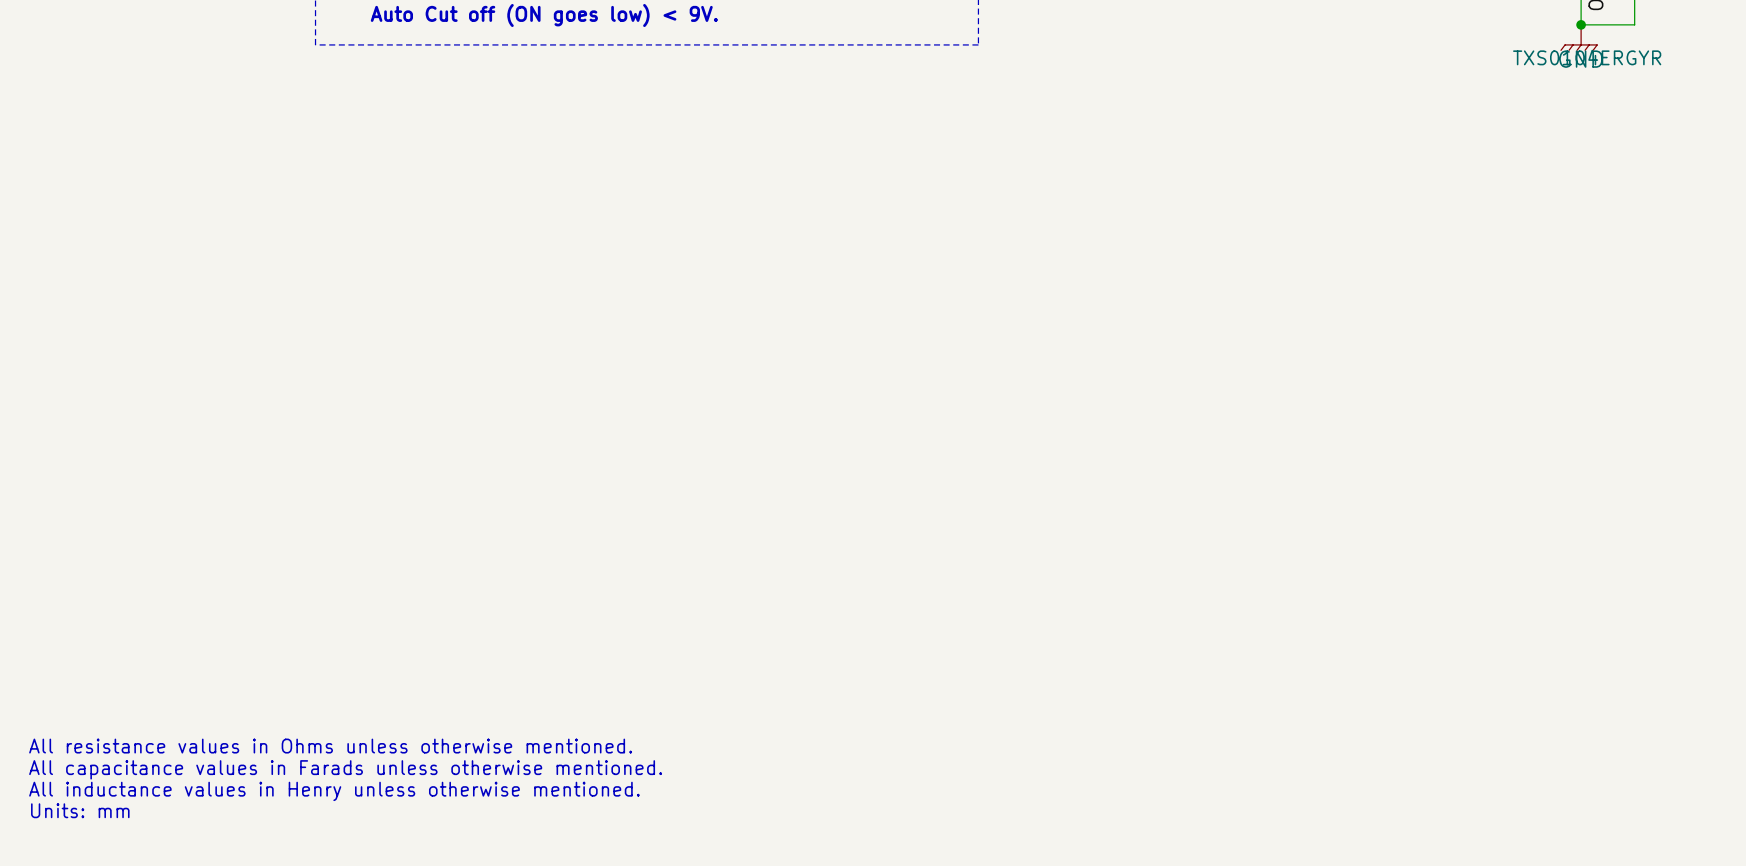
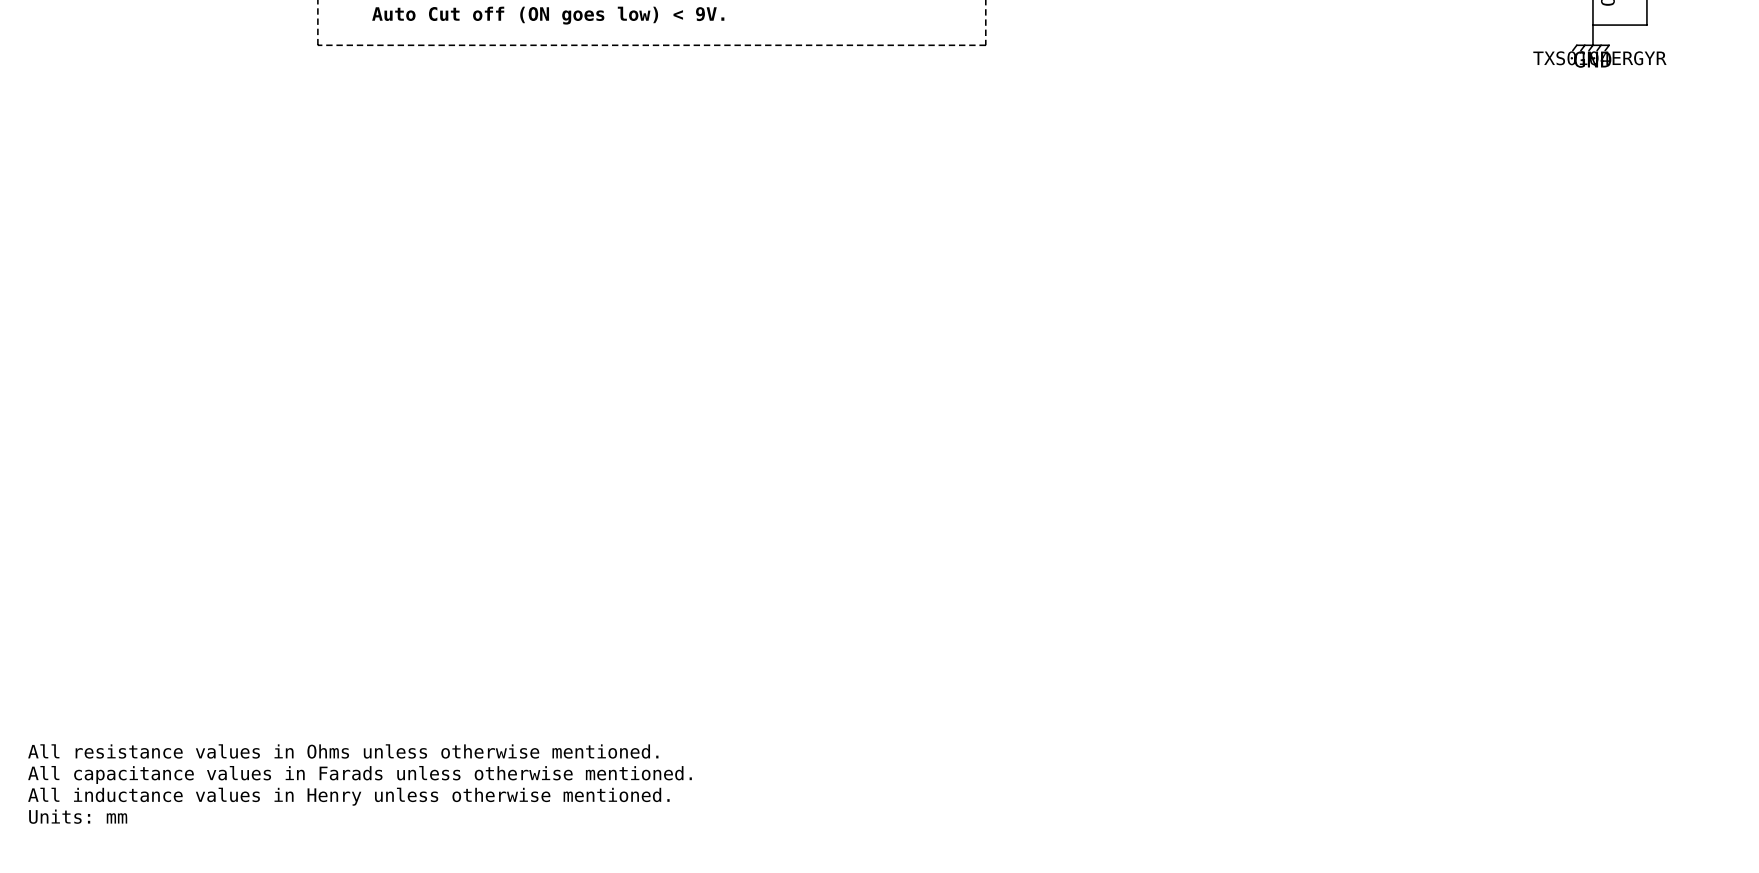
junction: (1581, 24) -> none

